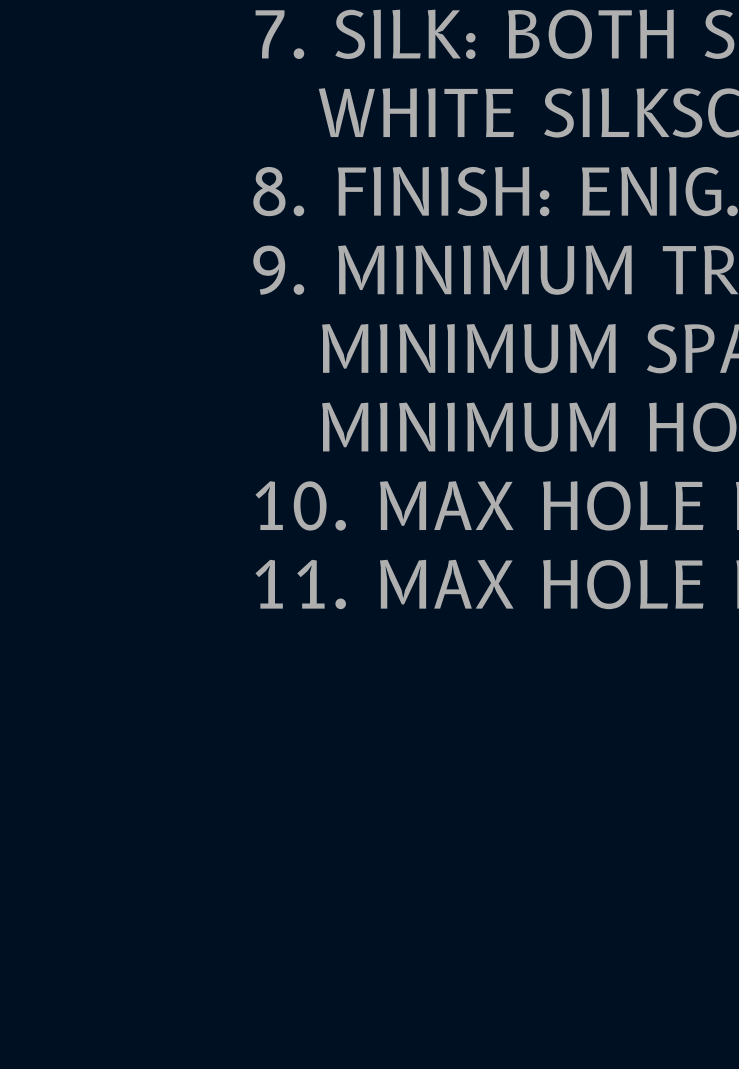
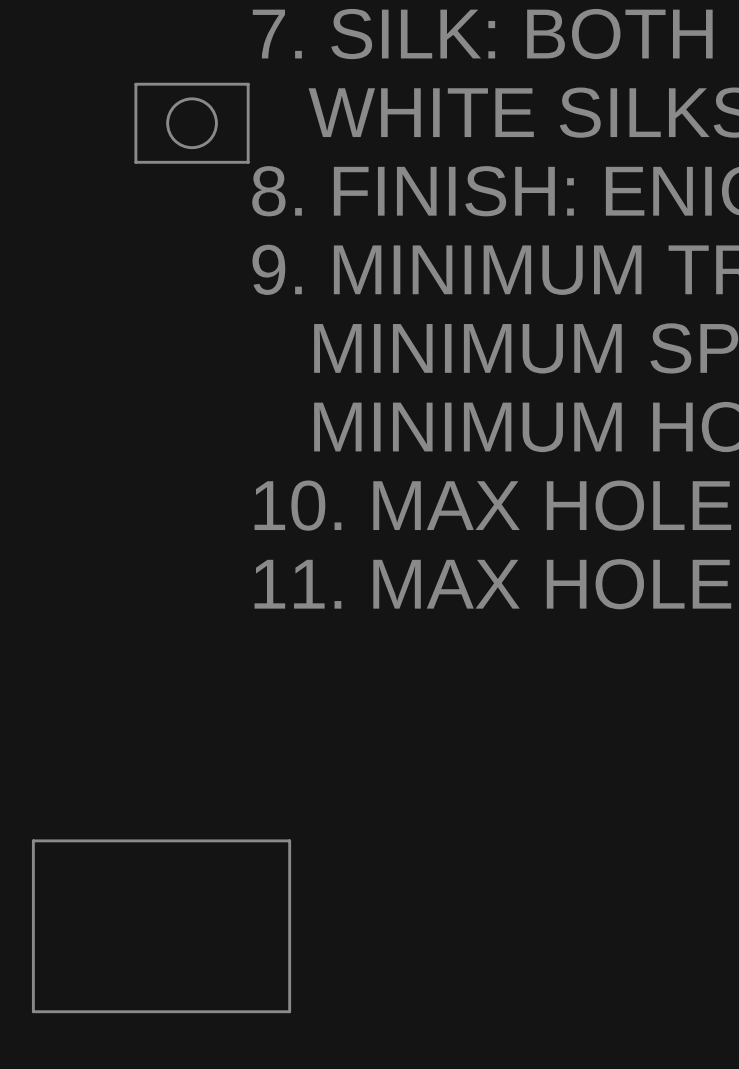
line: none -> (135, 84) (135, 162) (248, 162) (248, 84) (135, 84)
drawing: none -> [166, 97, 218, 150]
line: none -> (33, 840) (33, 1011) (289, 1011) (289, 840) (33, 840)

